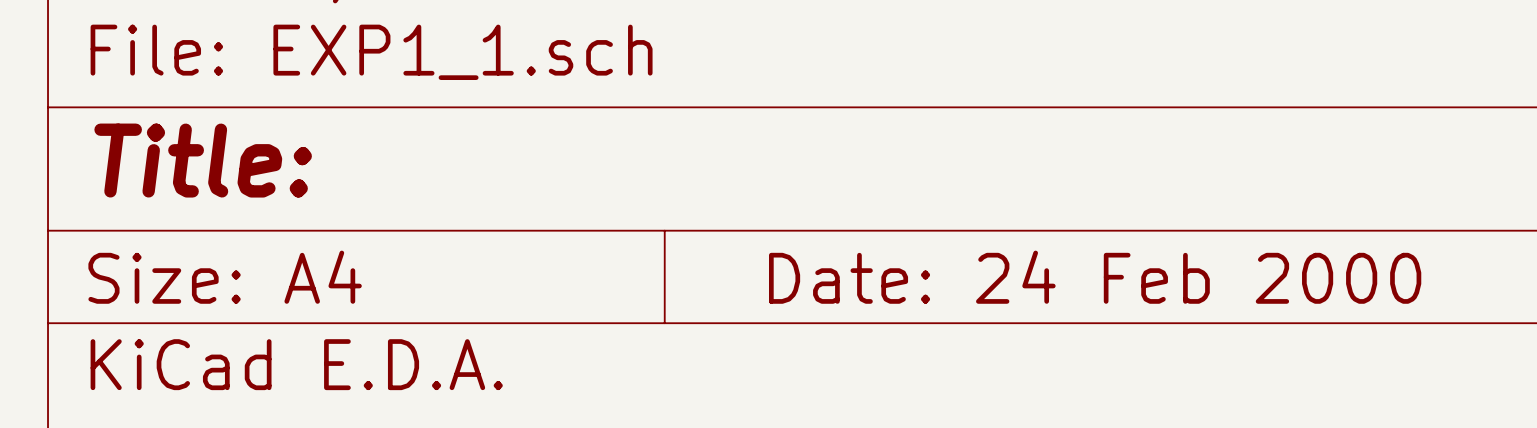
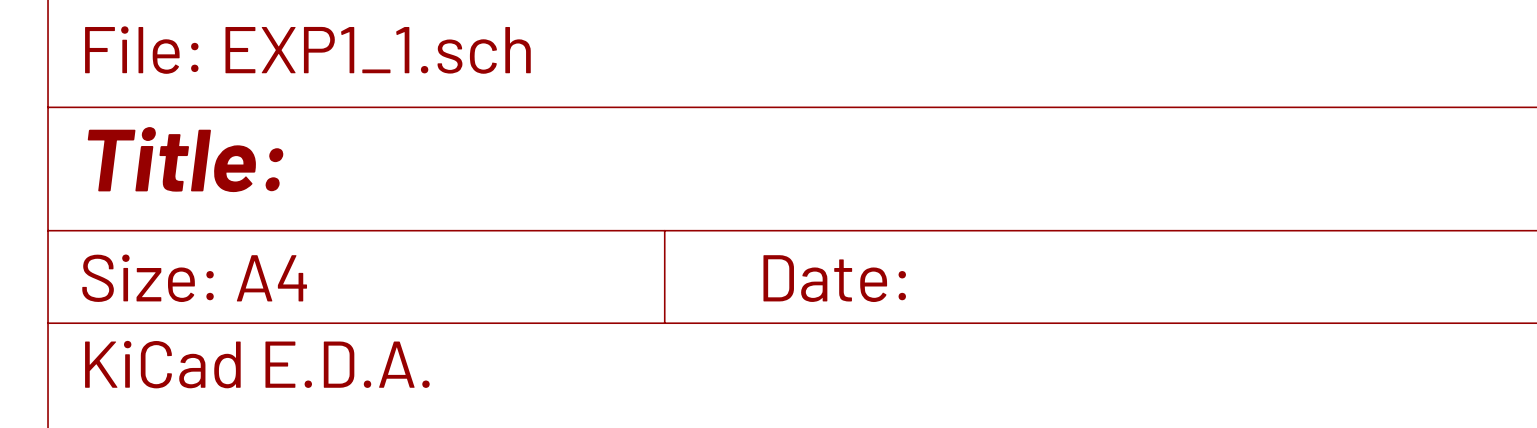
title block: Date: 24 Feb 2000 (1095, 277) -> Date: (834, 278)

